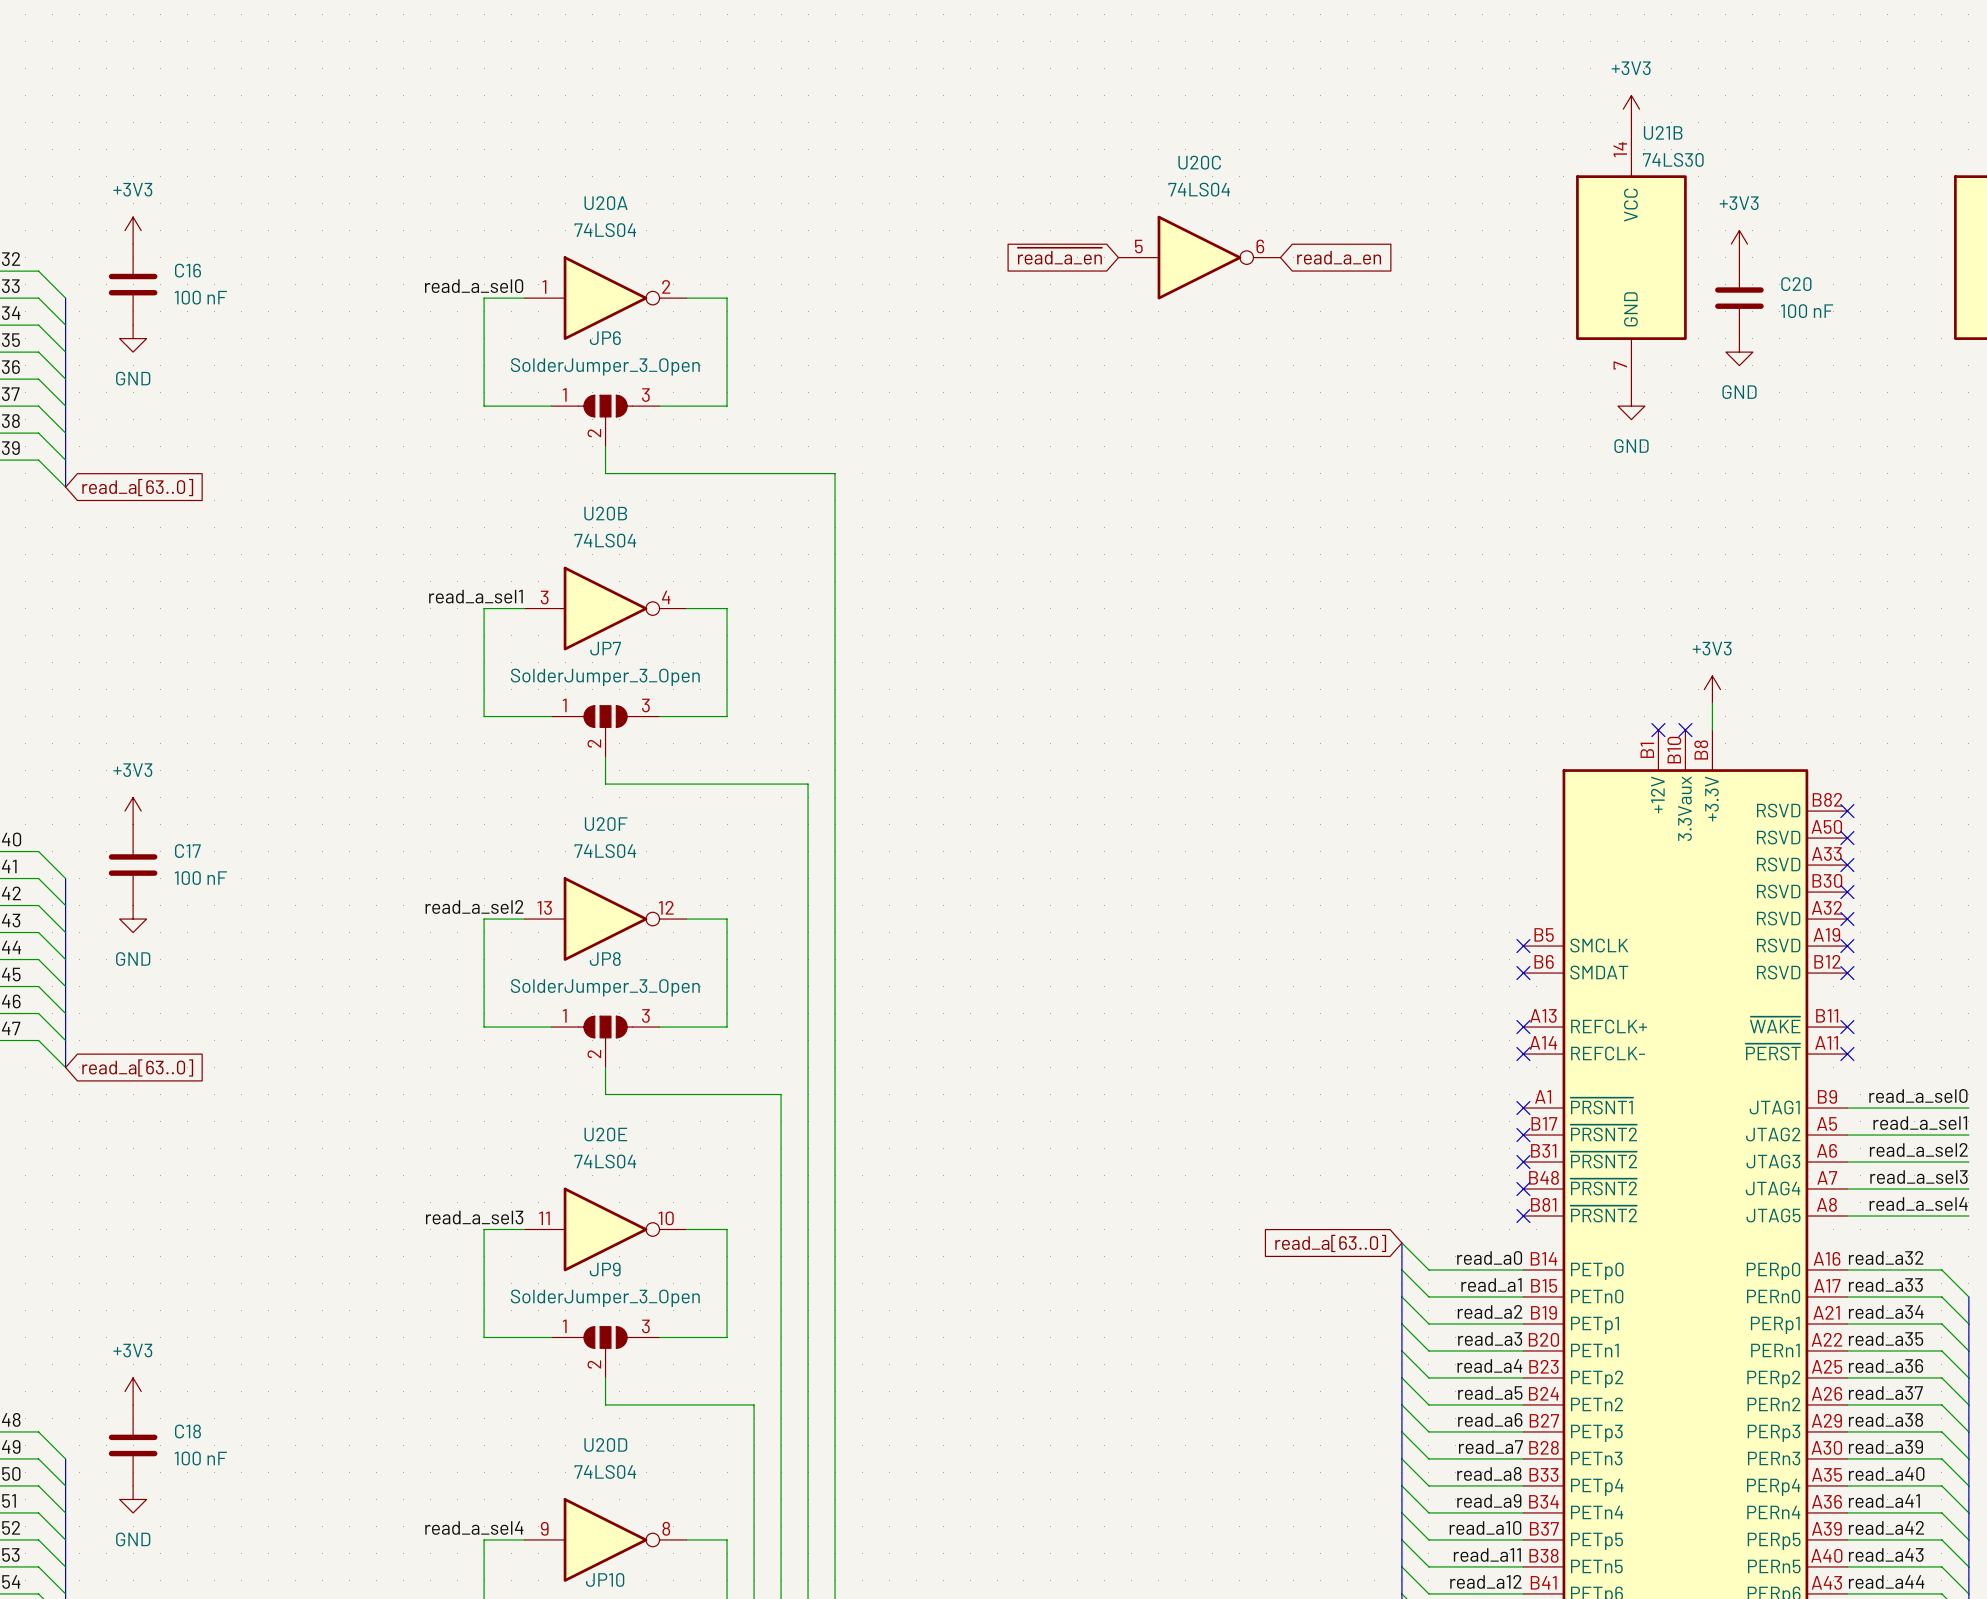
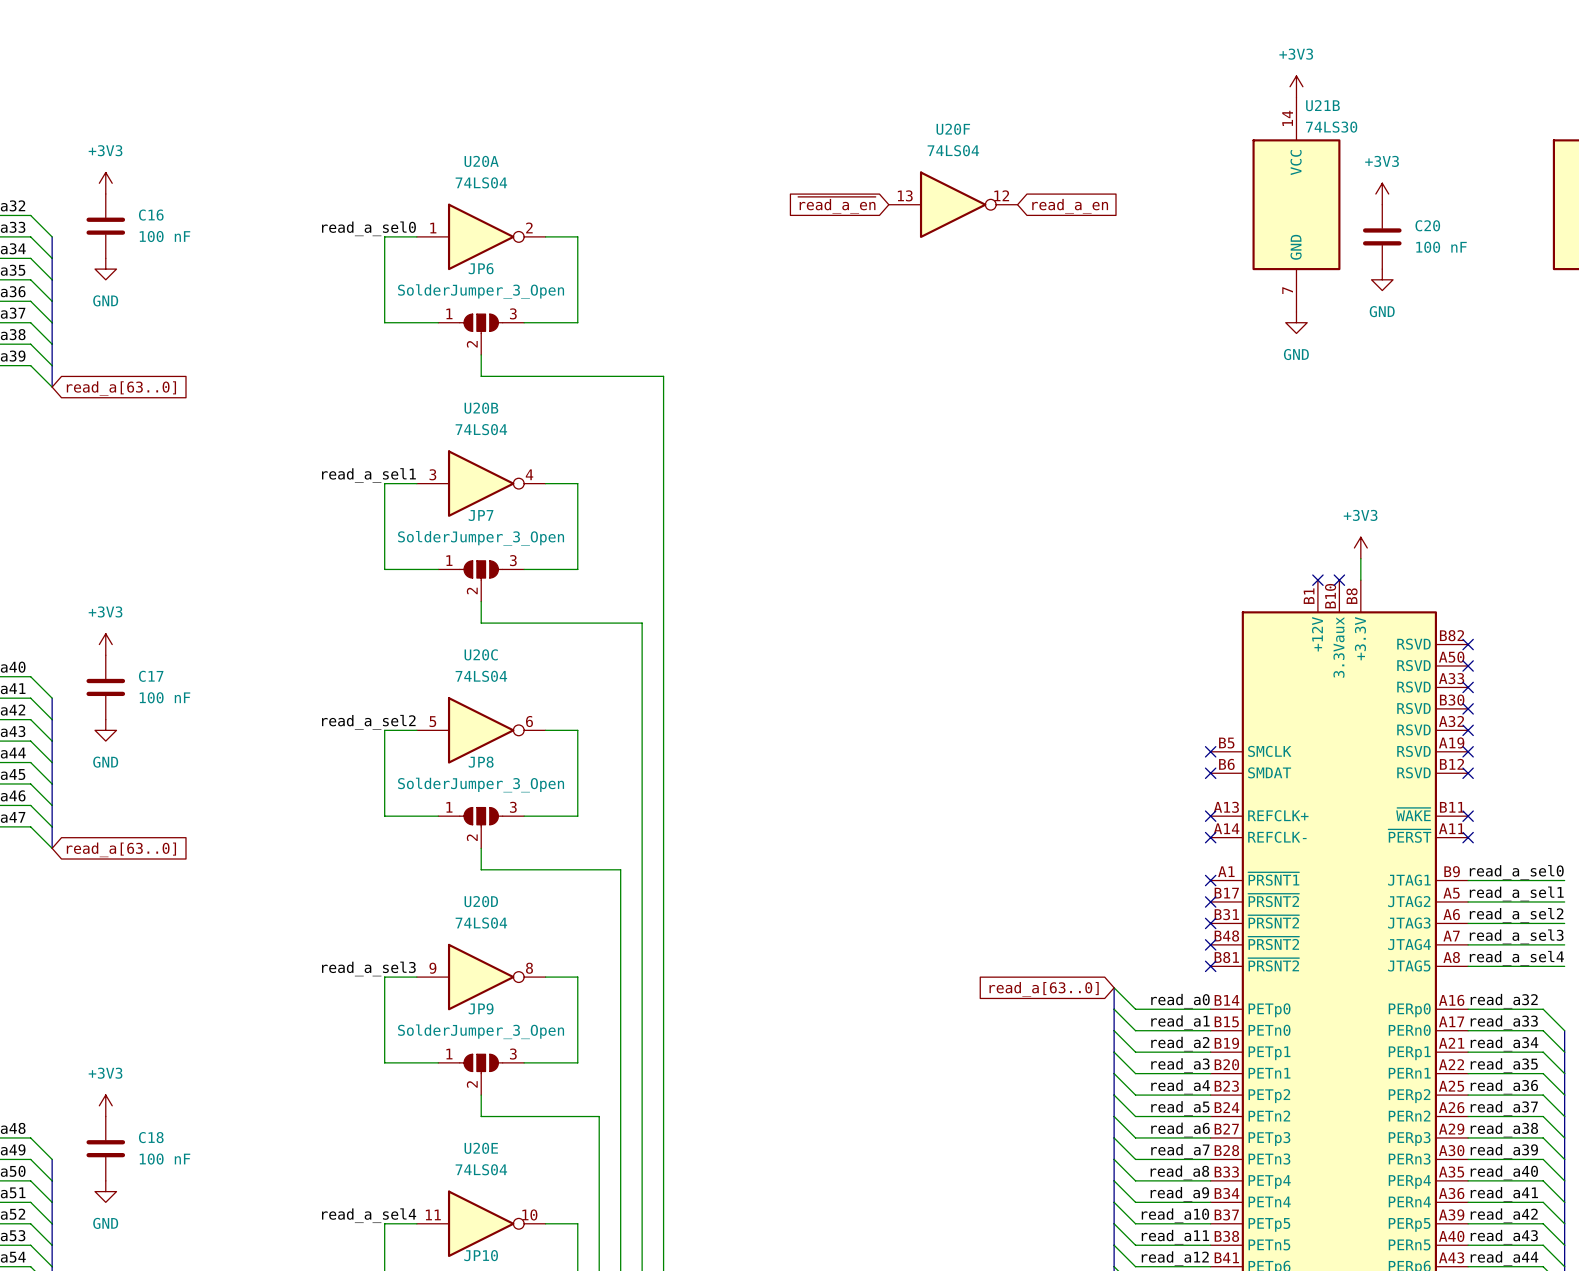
U20C position: (1199, 257) -> (481, 730)
U20F position: (605, 919) -> (953, 204)
U20E position: (605, 1229) -> (481, 1223)
U20D position: (605, 1539) -> (481, 977)

